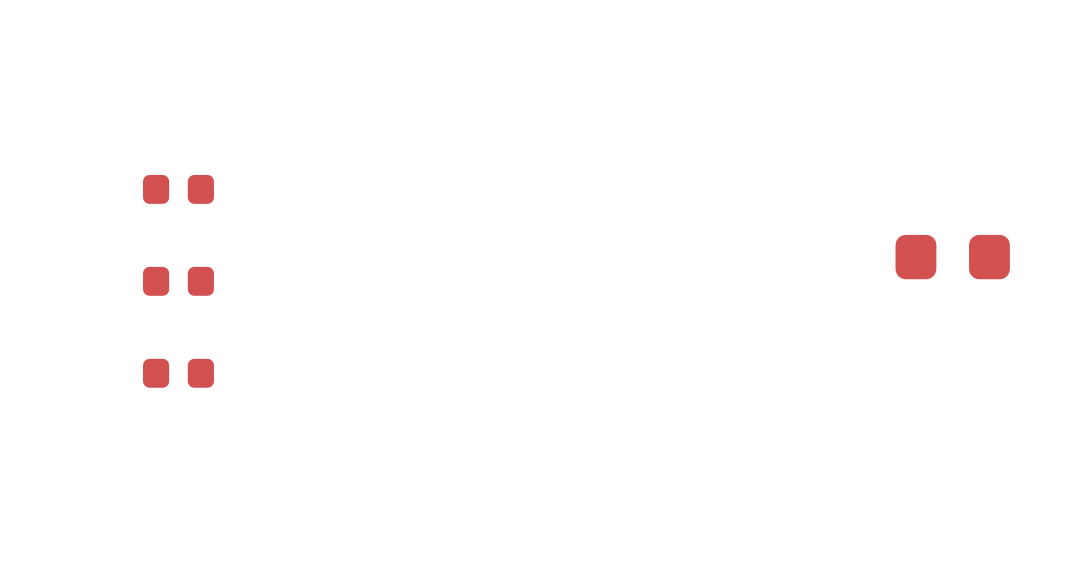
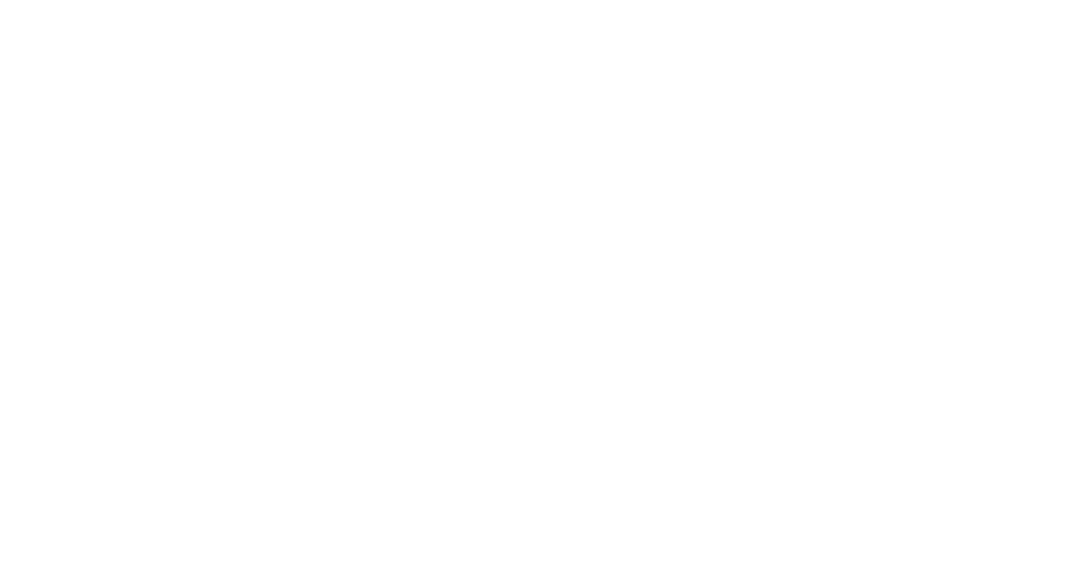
part: (178, 189) -> none
part: (952, 257) -> none
part: (178, 281) -> none
part: (178, 373) -> none

